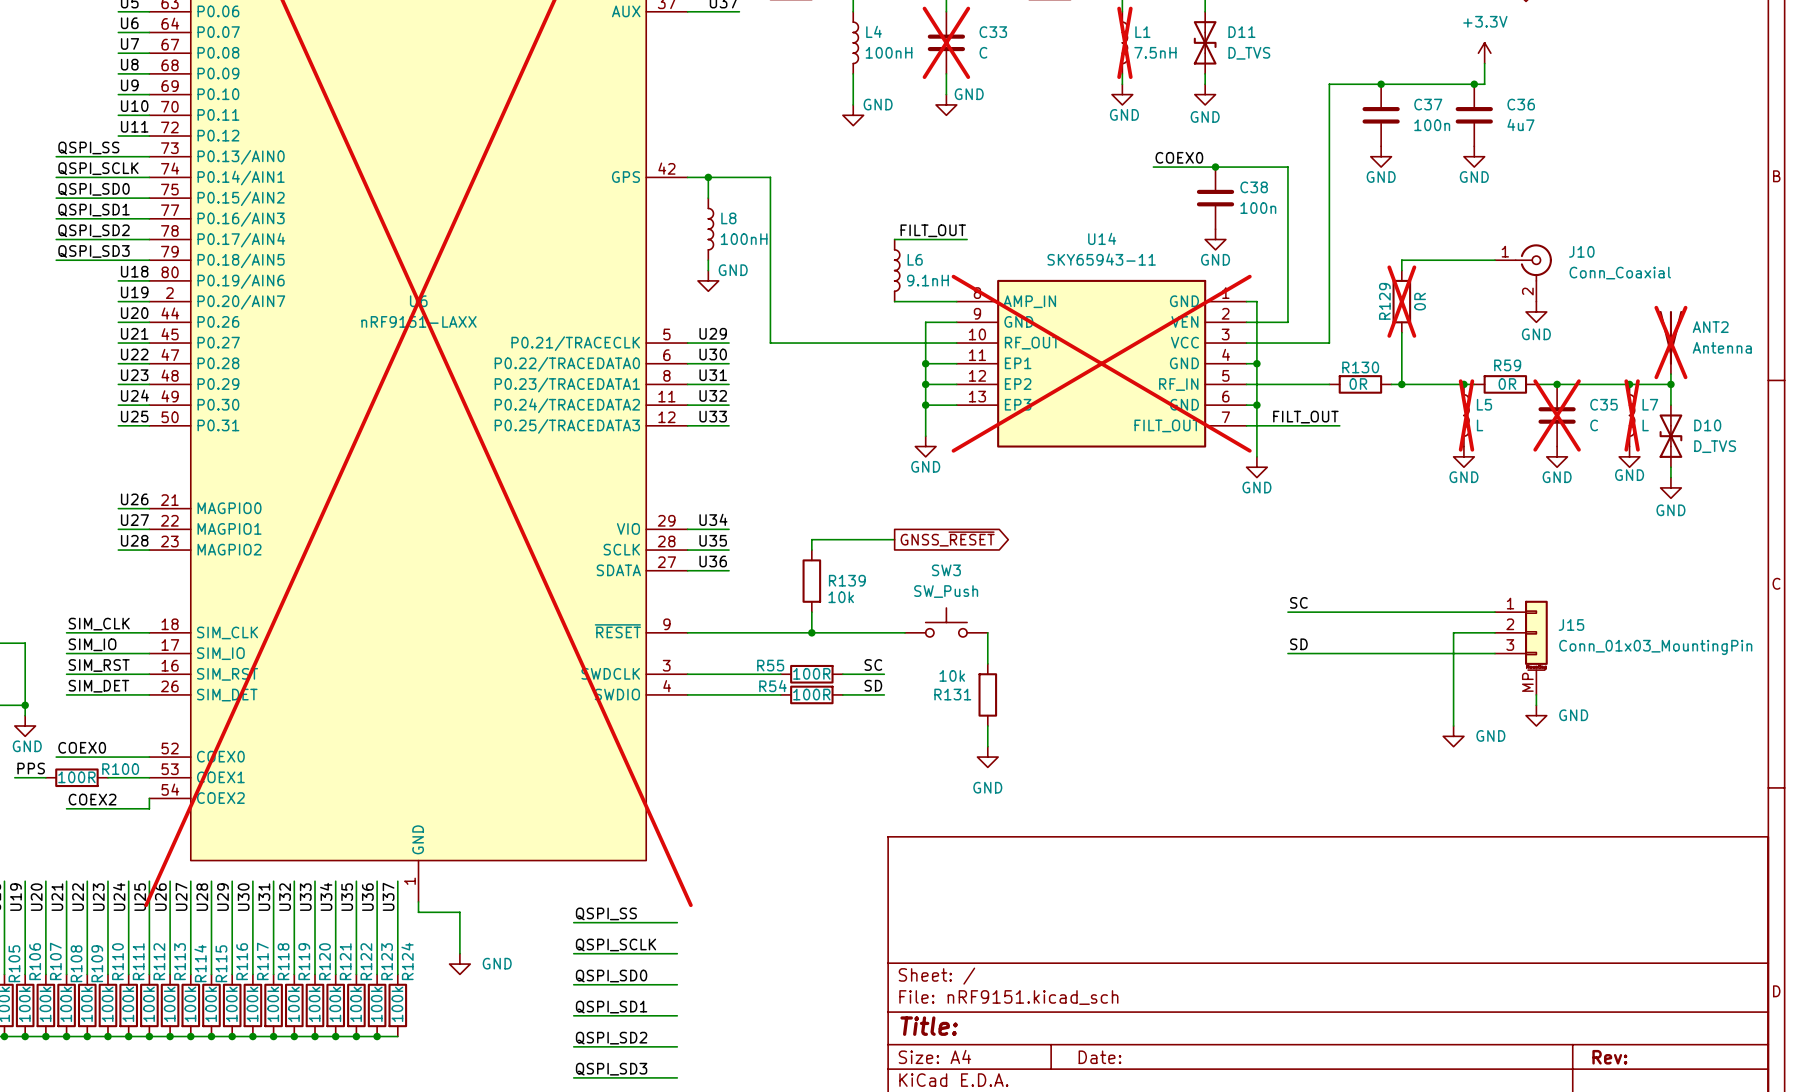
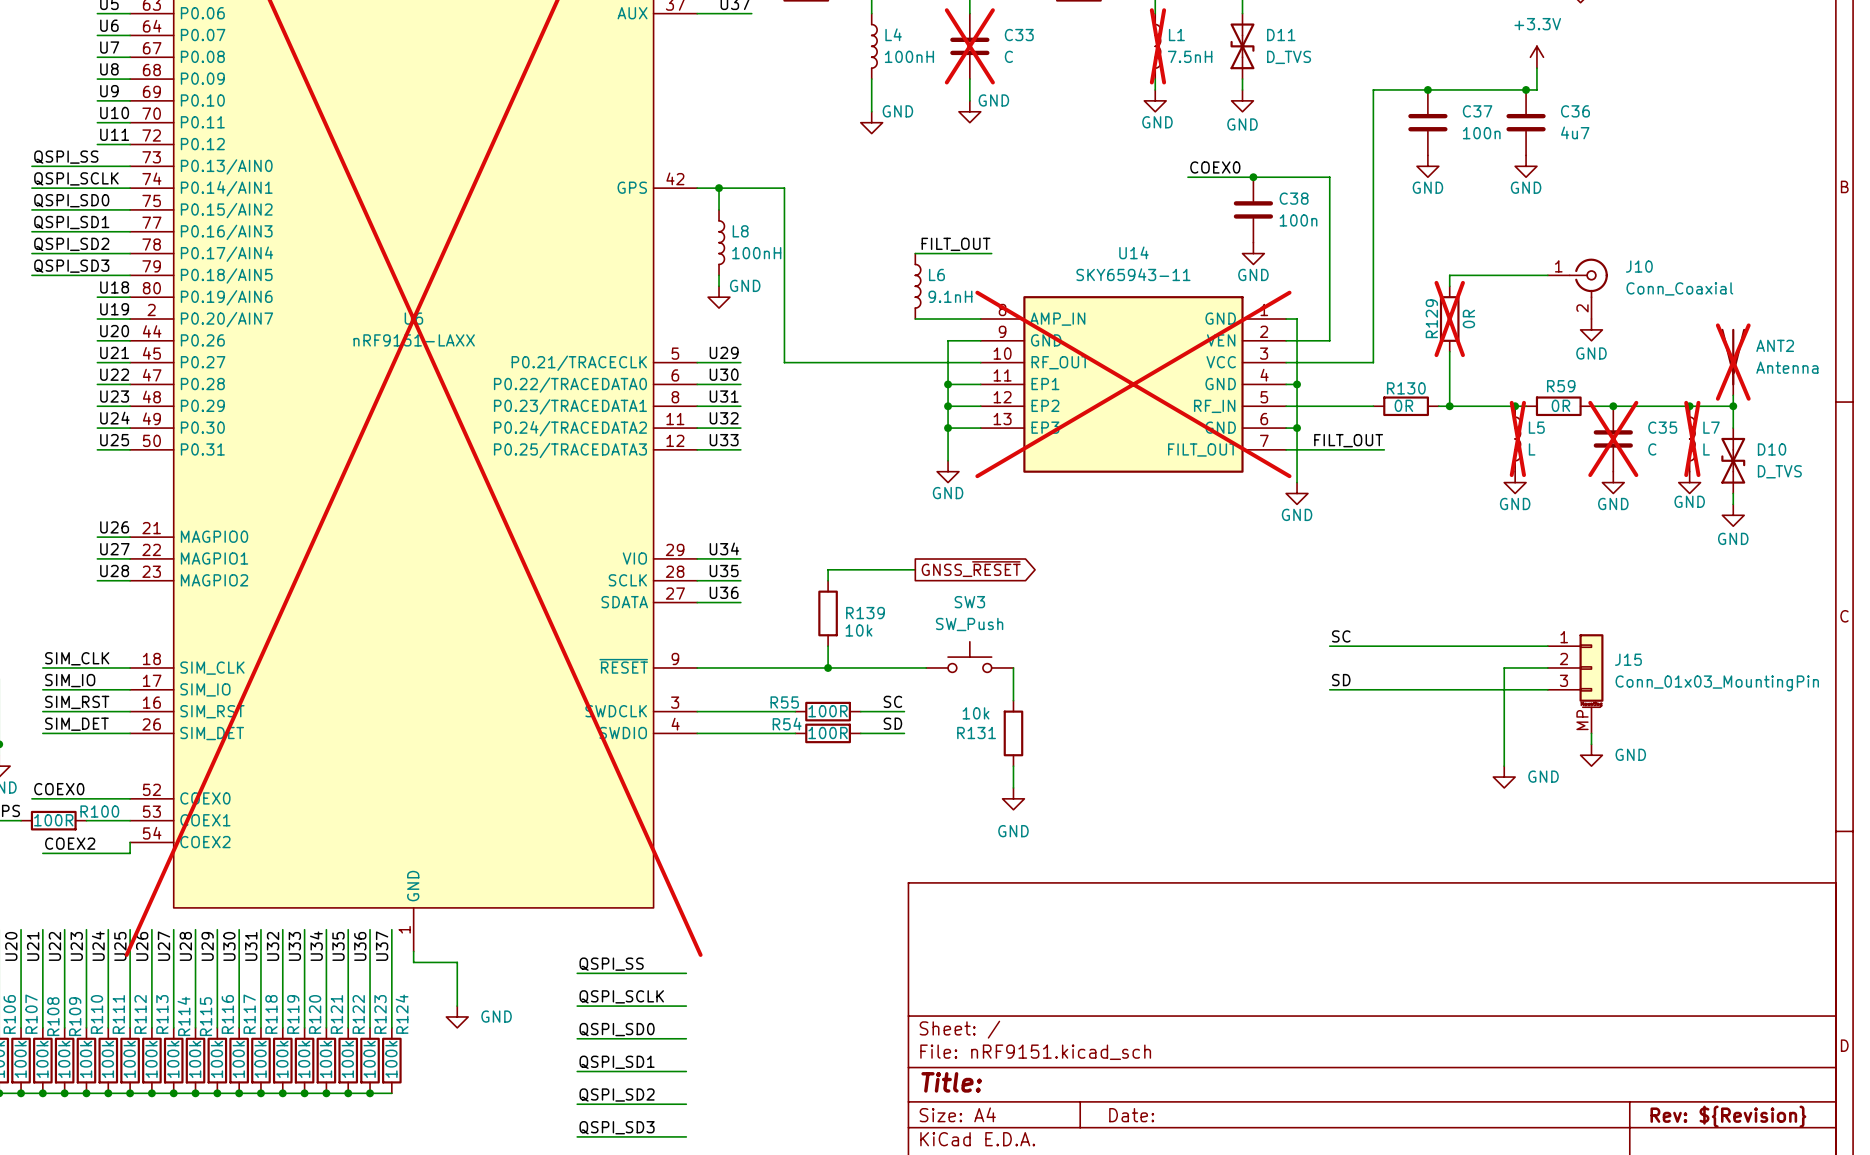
title block: Rev: (1609, 1057) -> Rev: ${Revision} (1728, 1116)

